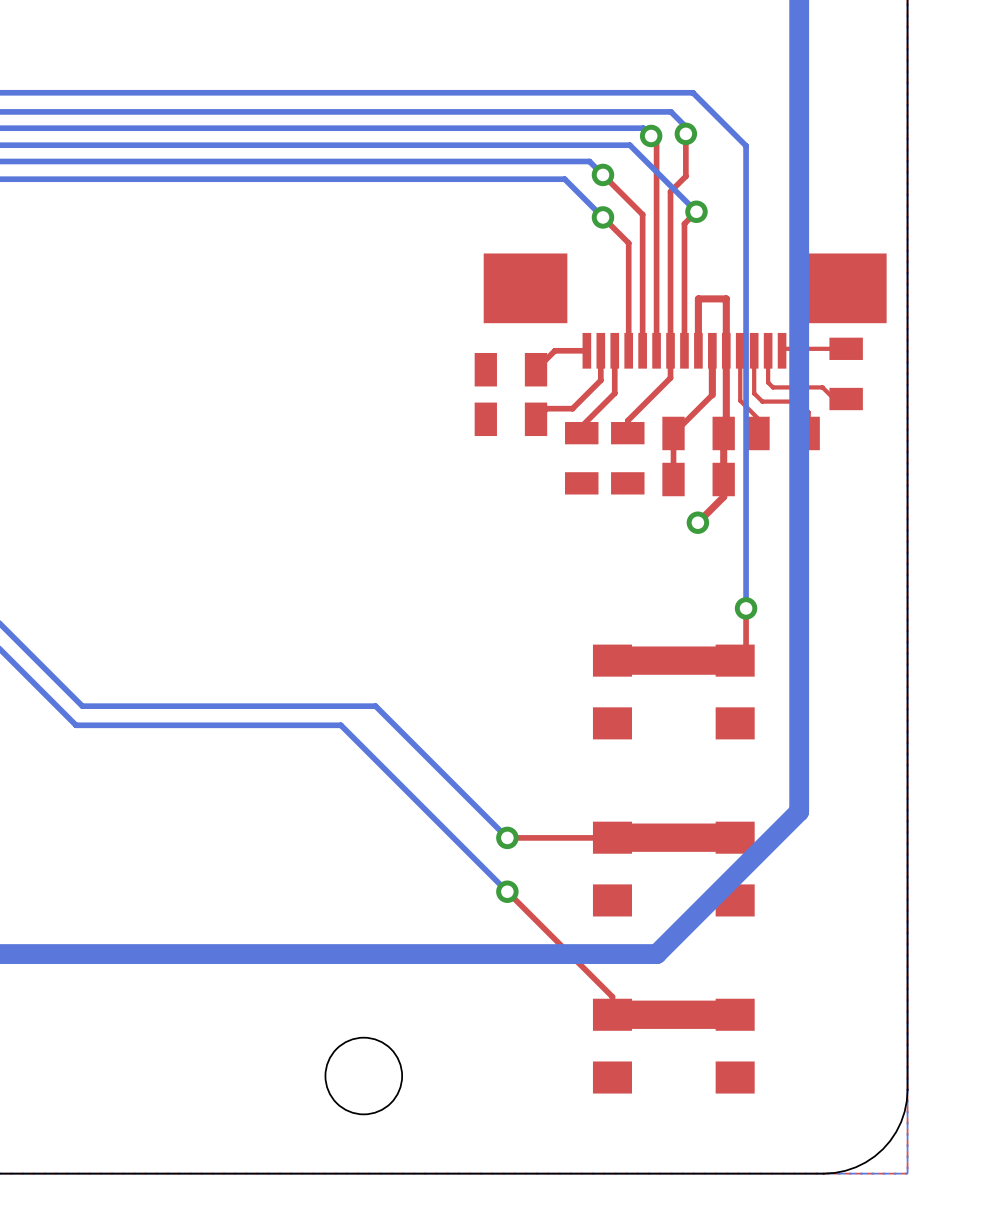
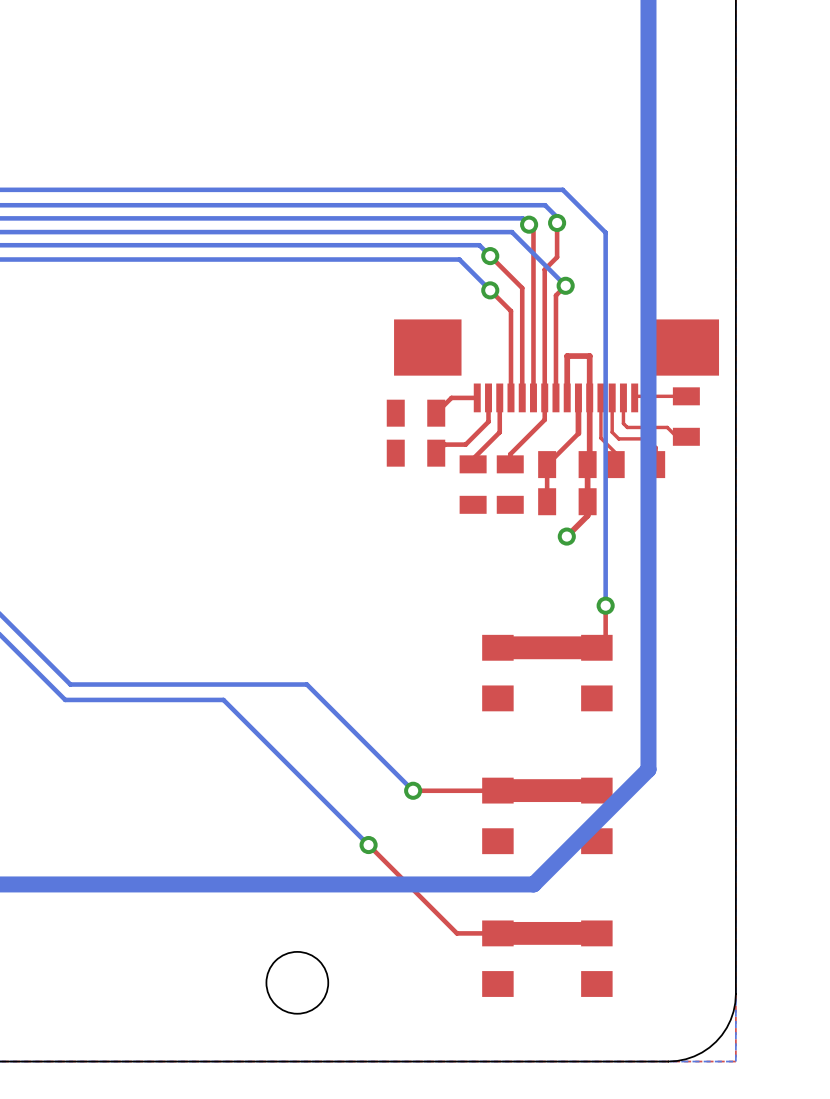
bottom track: (272, 725) (340, 725) (507, 891) -> (223, 699) (368, 845)
top track: (507, 891) (612, 996) (612, 1014) -> (368, 845) (456, 933) (497, 933)
via position: (507, 891) -> (368, 845)

